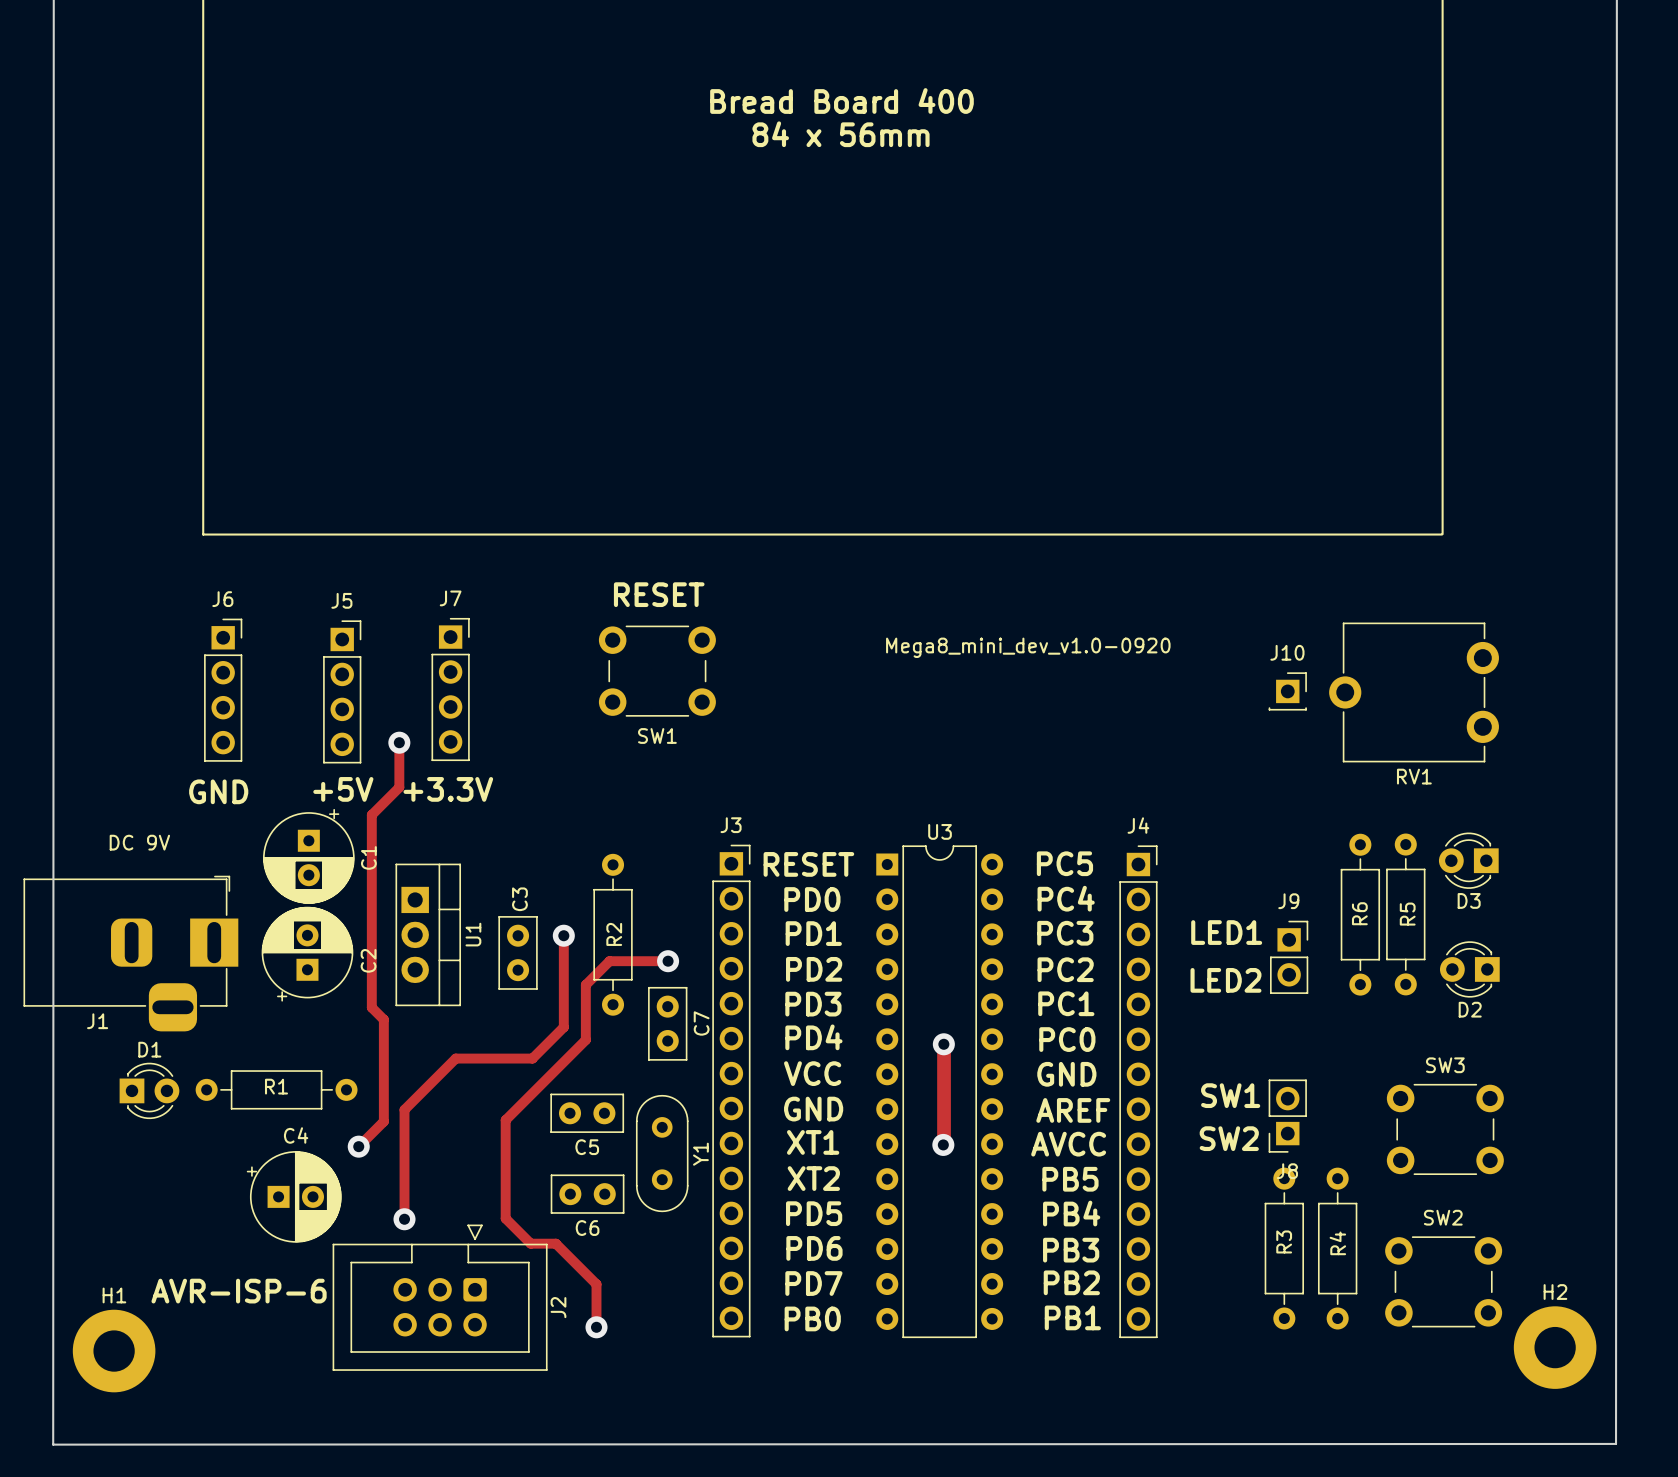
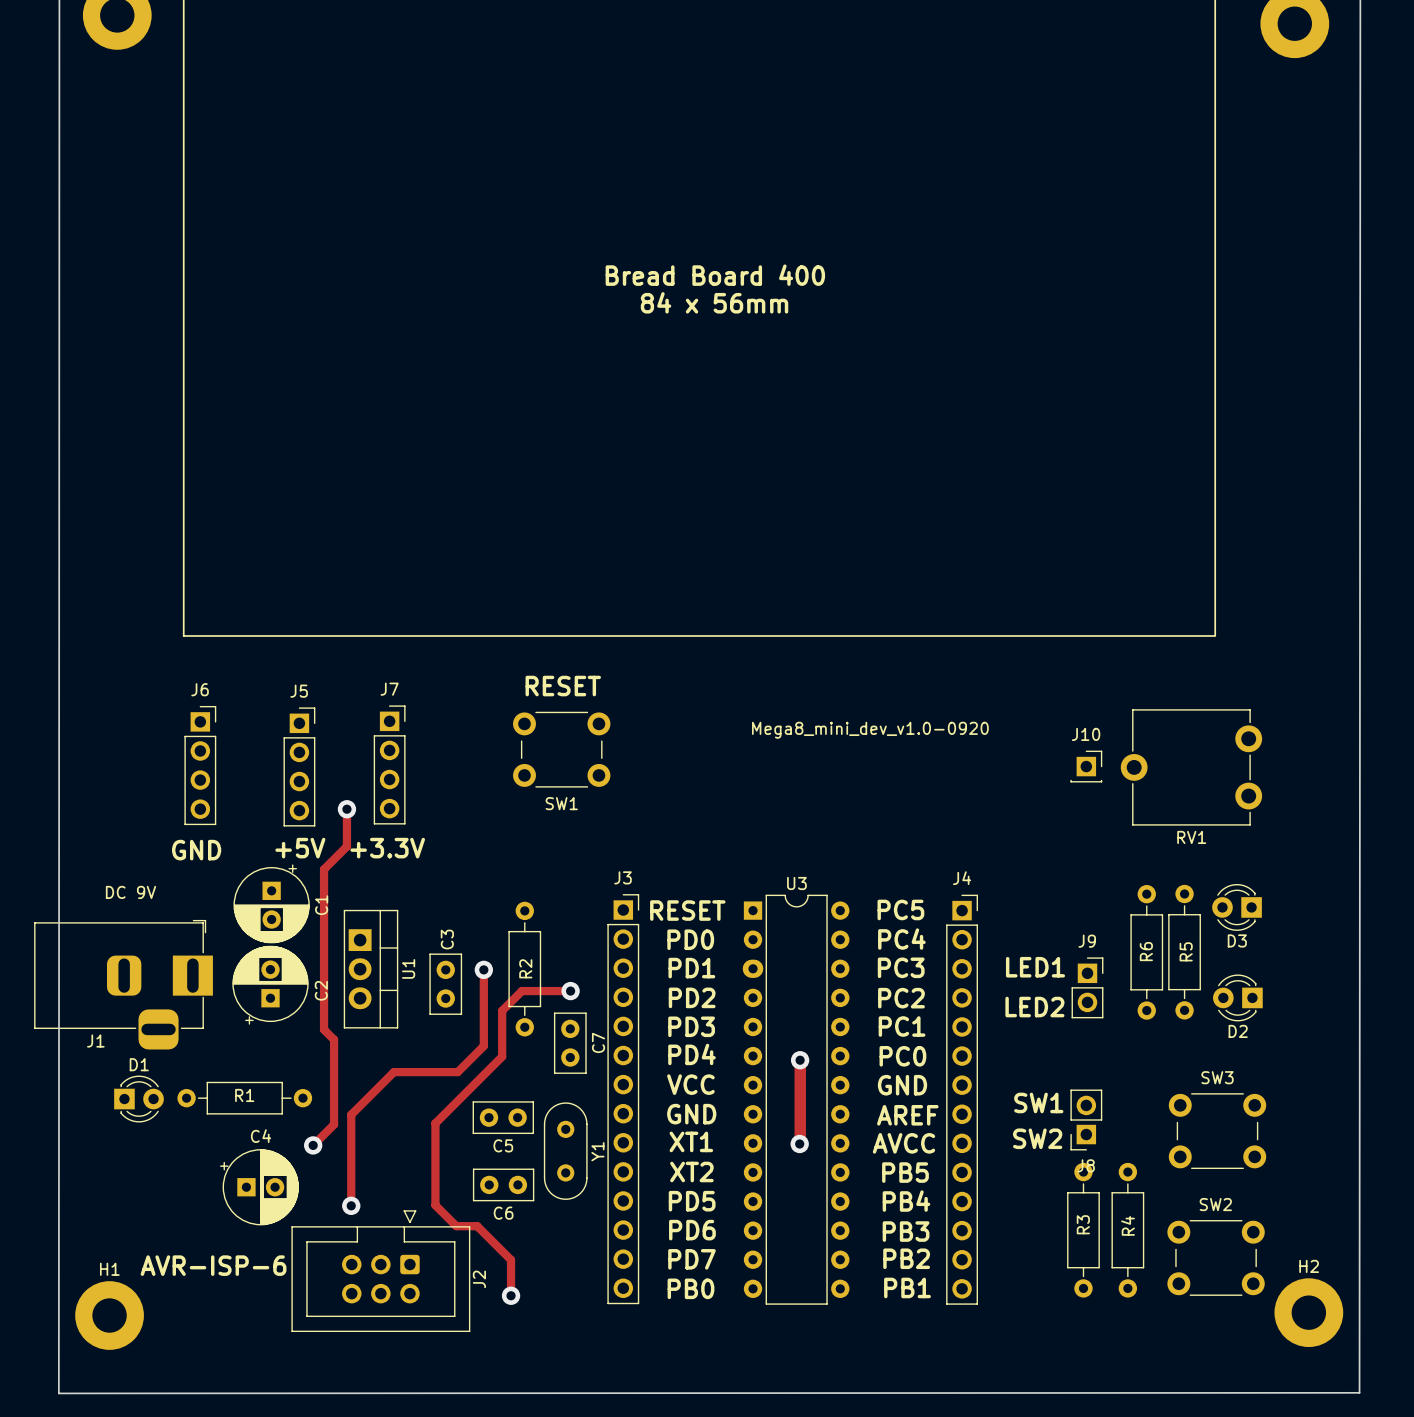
U3 footprint: [876, 845, 1004, 1339] -> [742, 894, 850, 1305]

